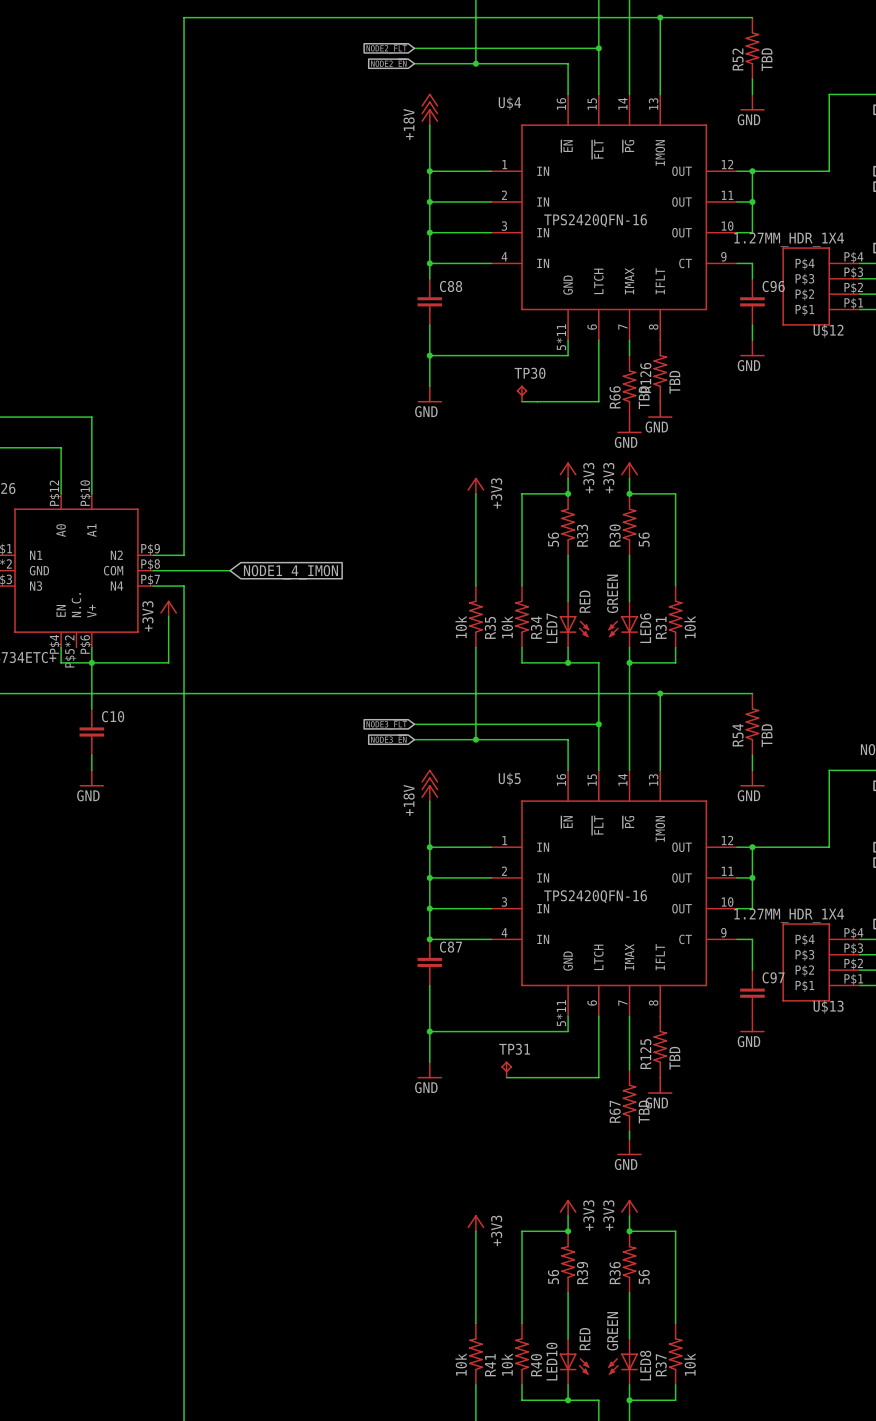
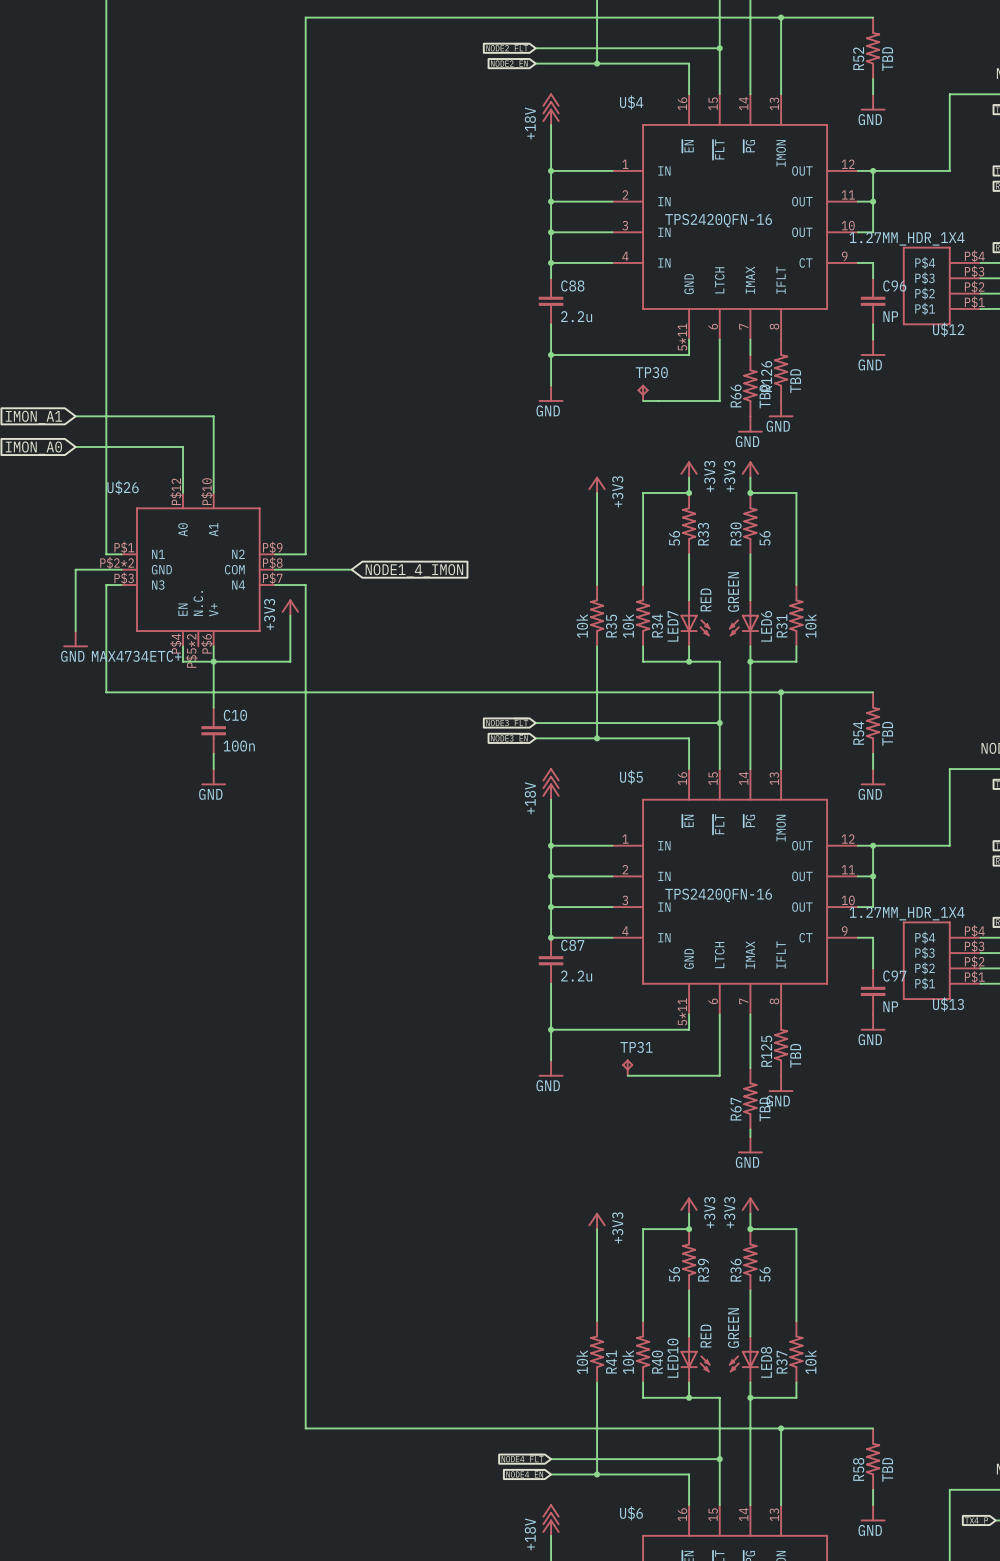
C88 value: none -> 2.2u (576, 316)
C96 value: none -> NP (890, 316)
C10 value: none -> 100n (239, 746)
C87 value: none -> 2.2u (576, 976)
C97 value: none -> NP (890, 1006)

